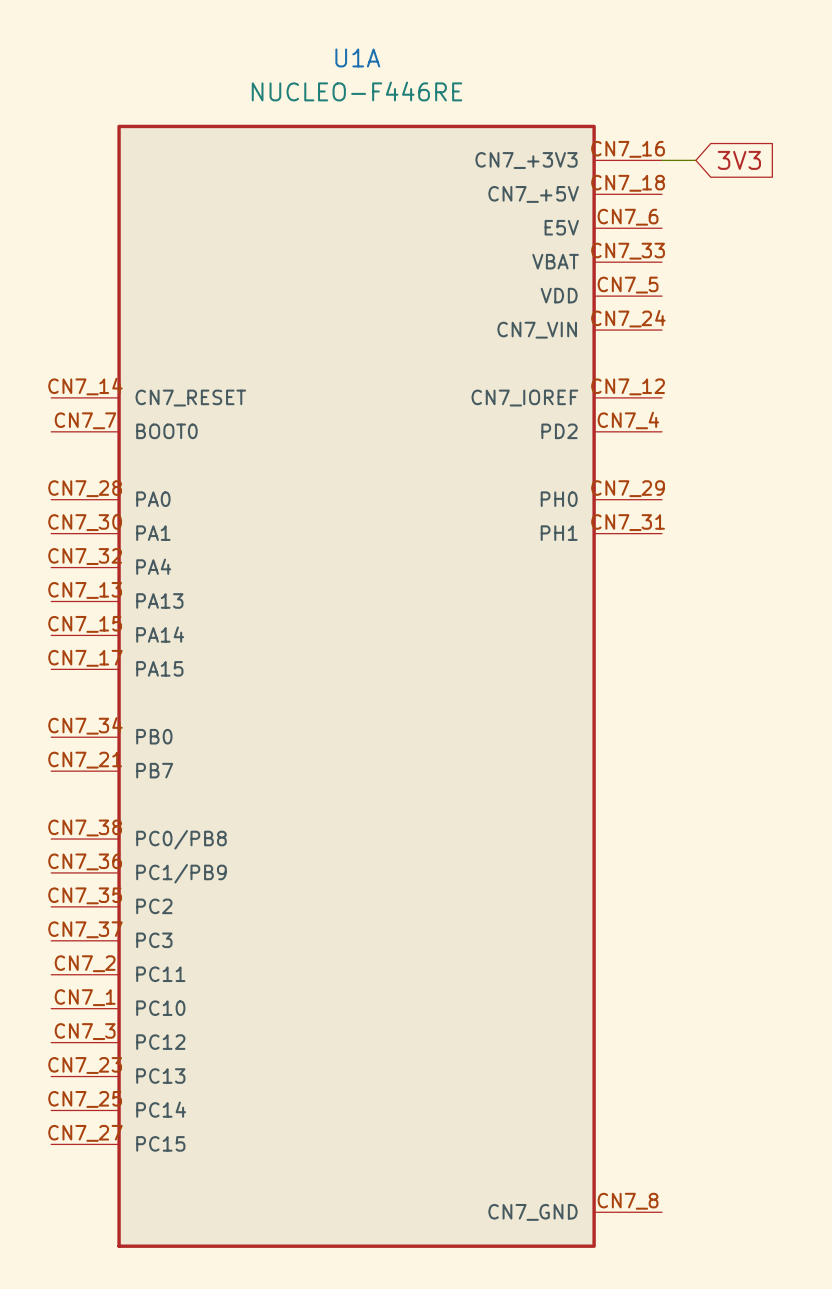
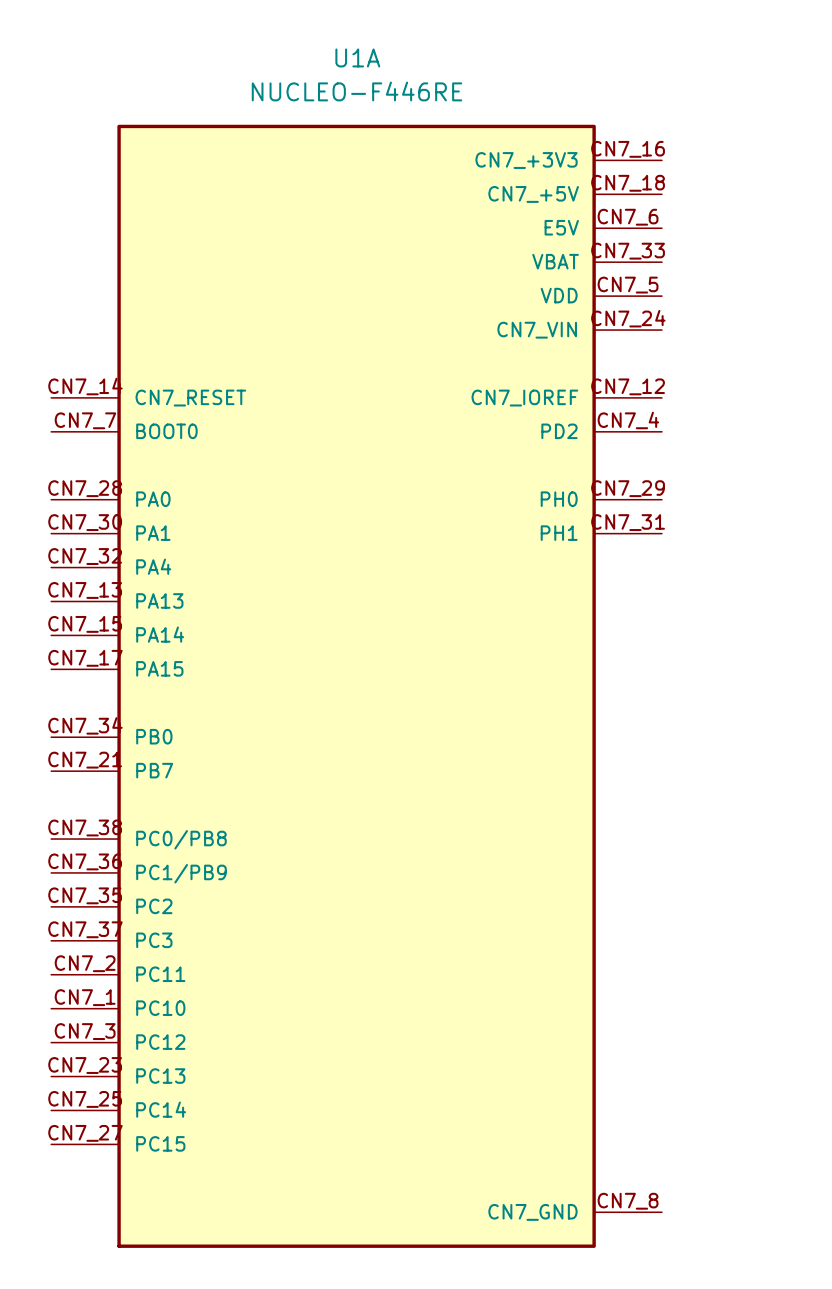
wire: (661, 160) (695, 160) -> none
global label: 3V3 (739, 160) -> none

